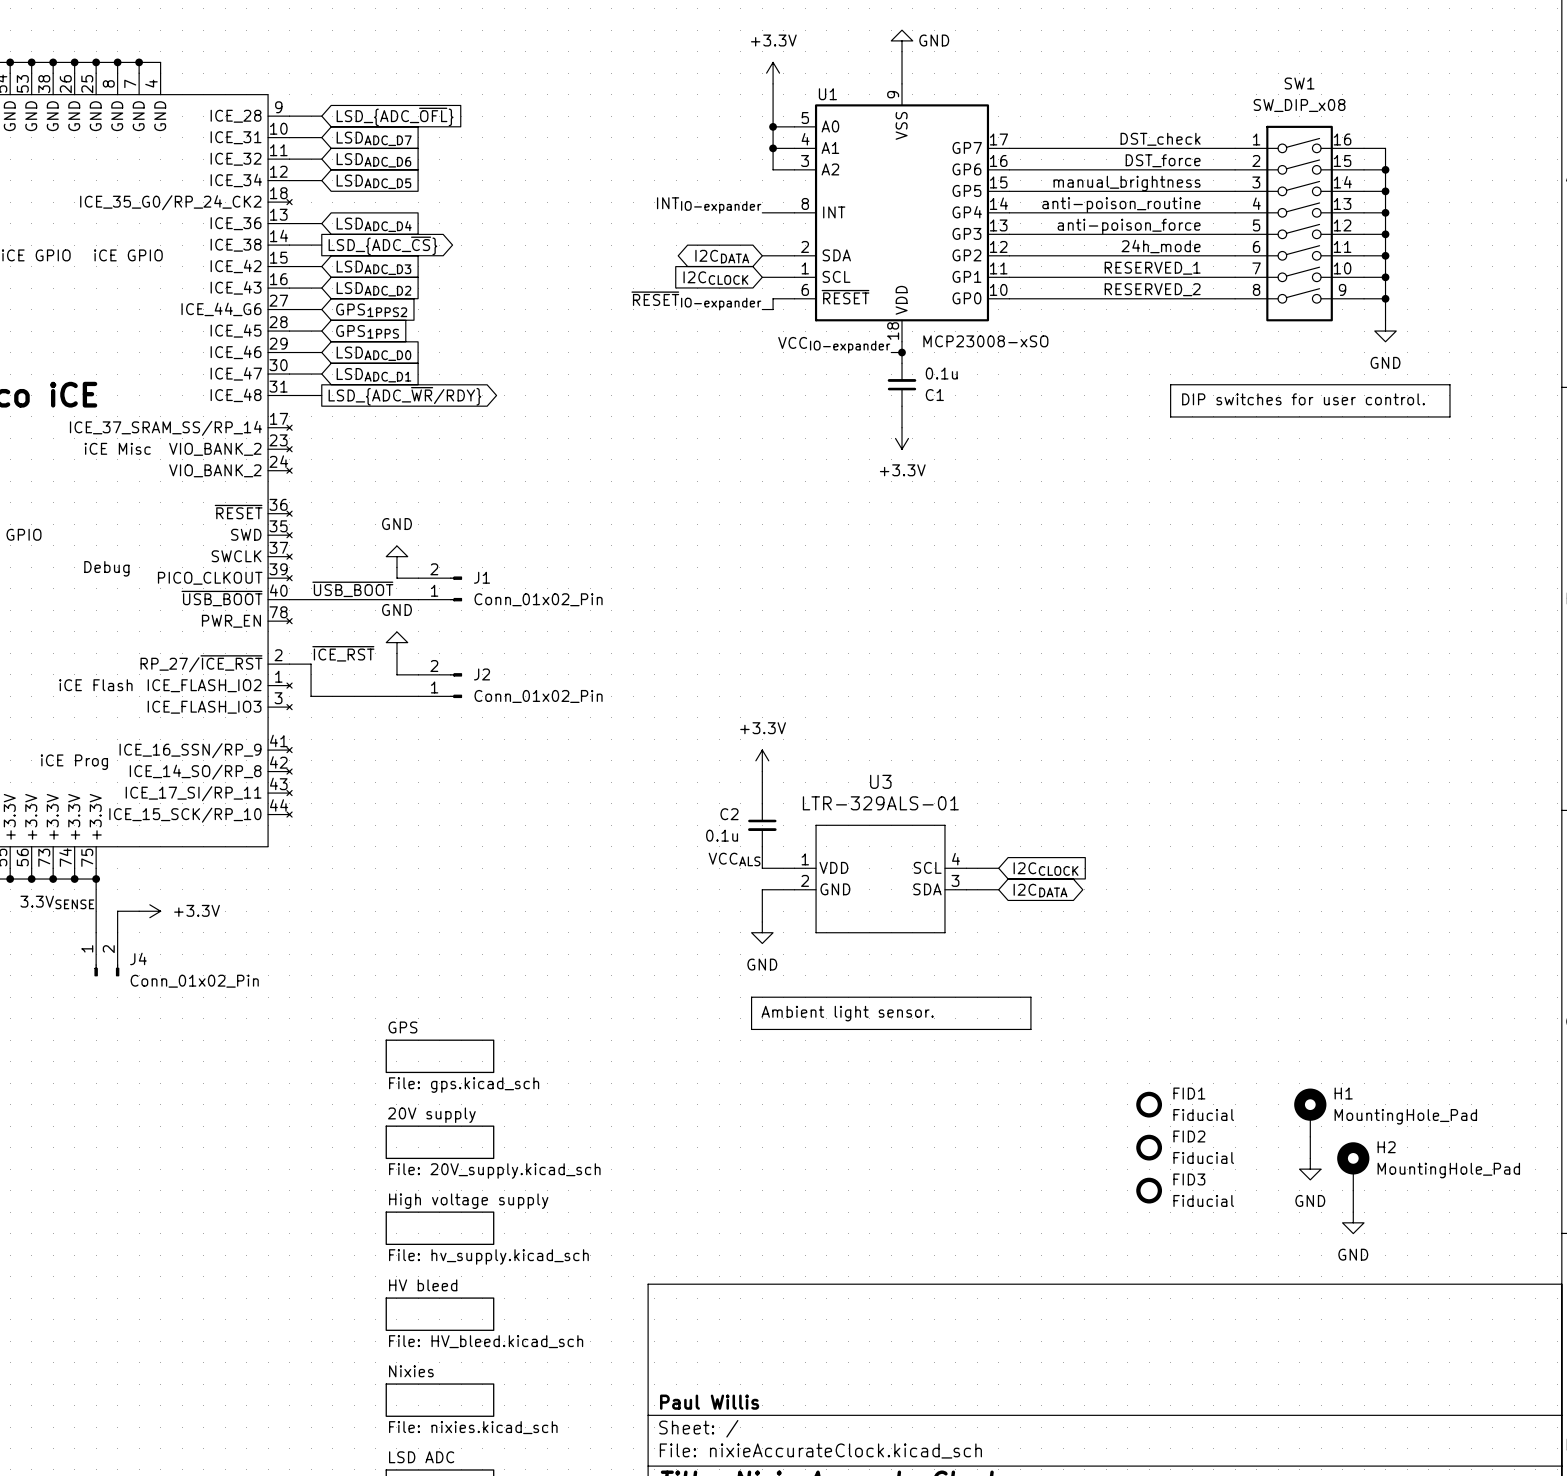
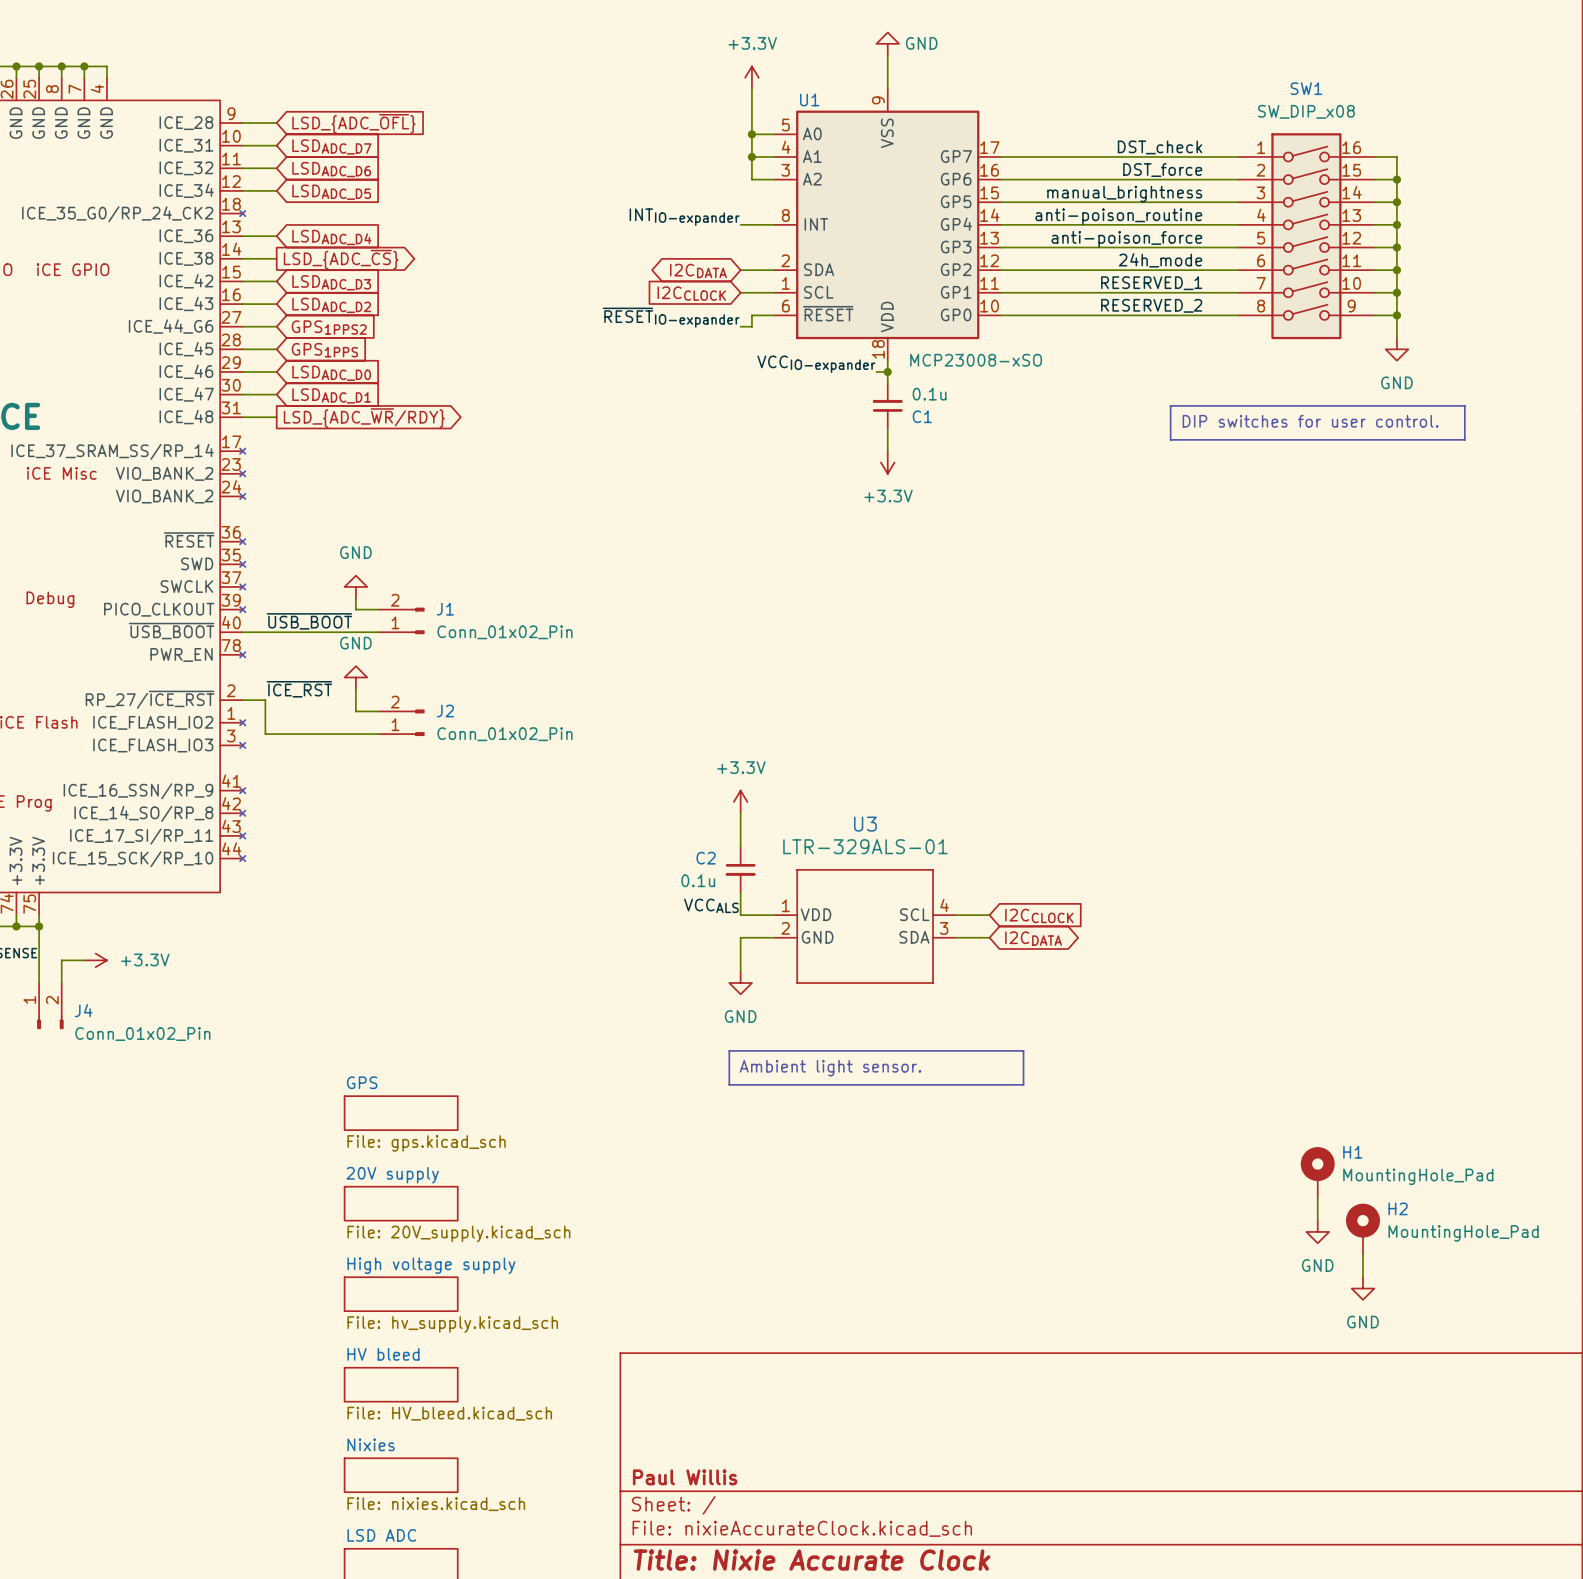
FID1: Fiducial (1149, 1104) -> none
FID2: Fiducial (1149, 1147) -> none
FID3: Fiducial (1149, 1190) -> none

